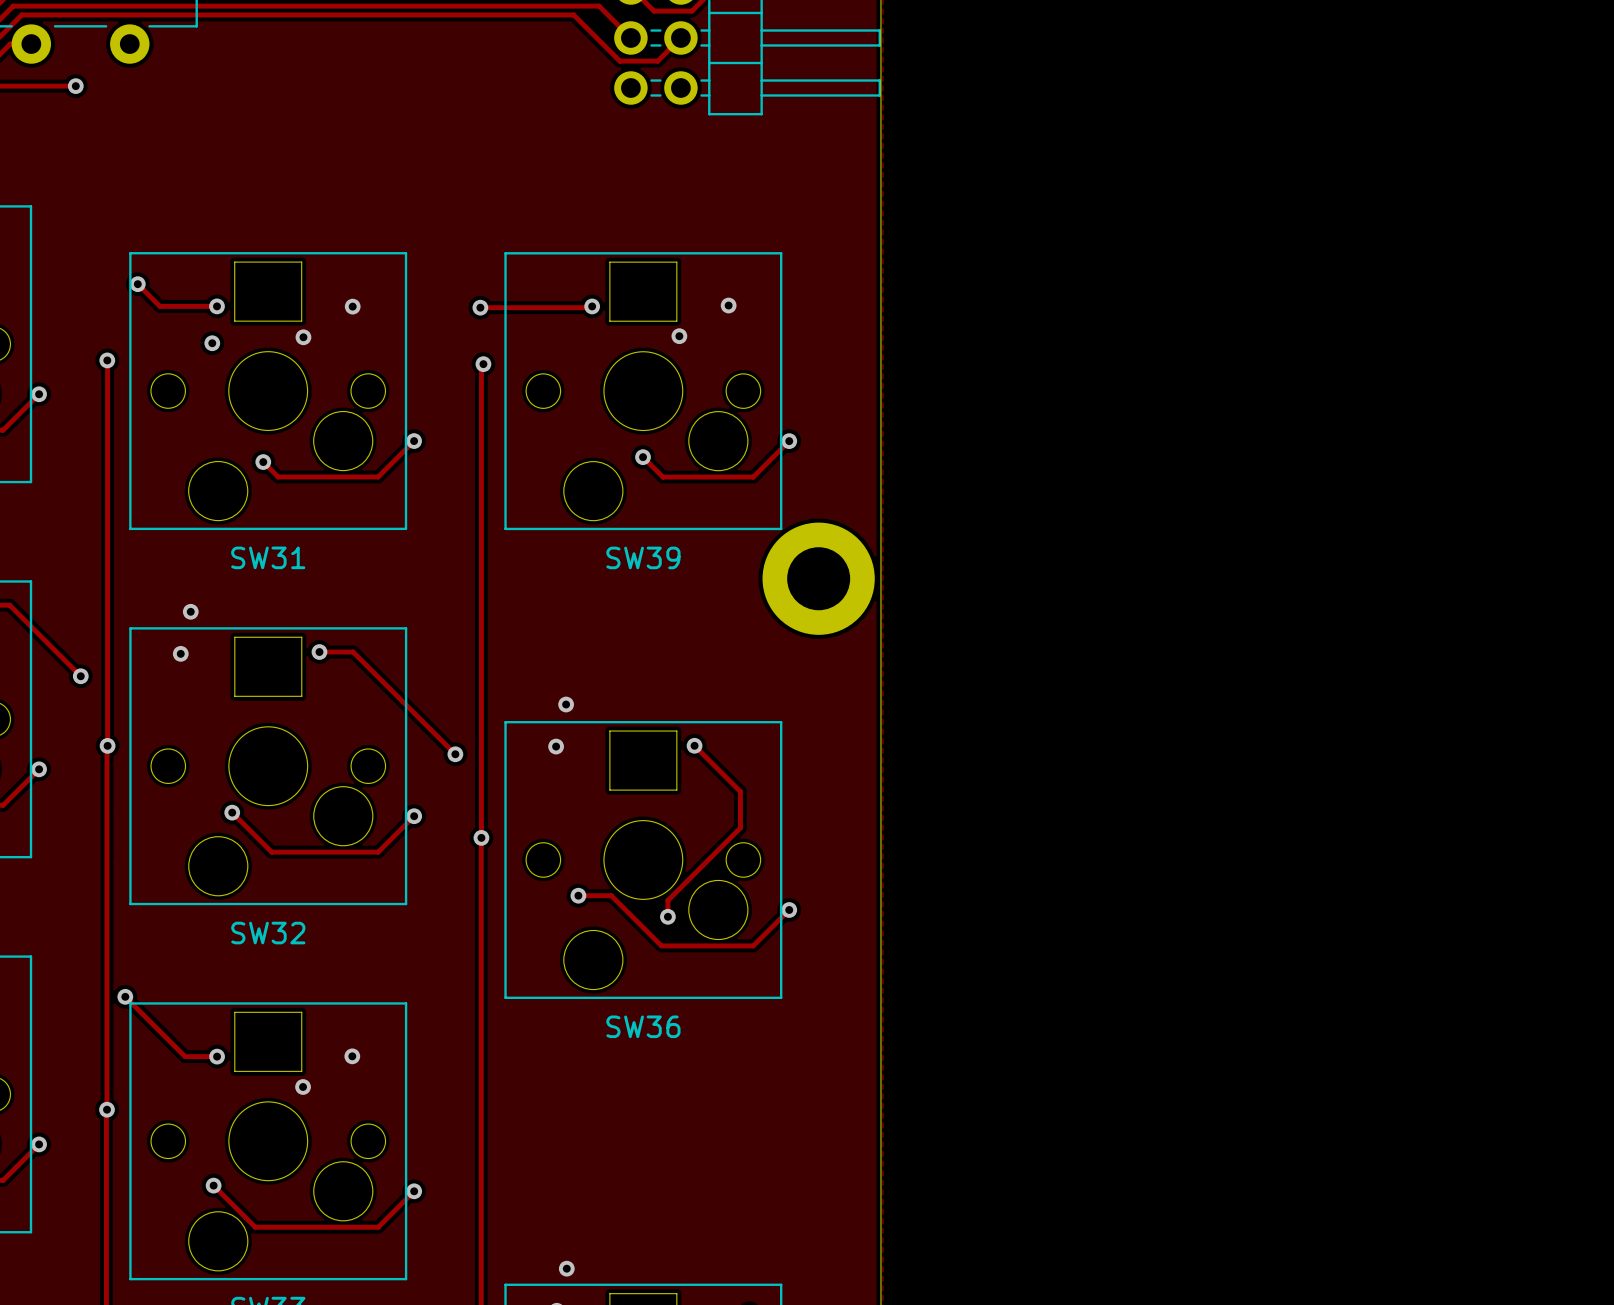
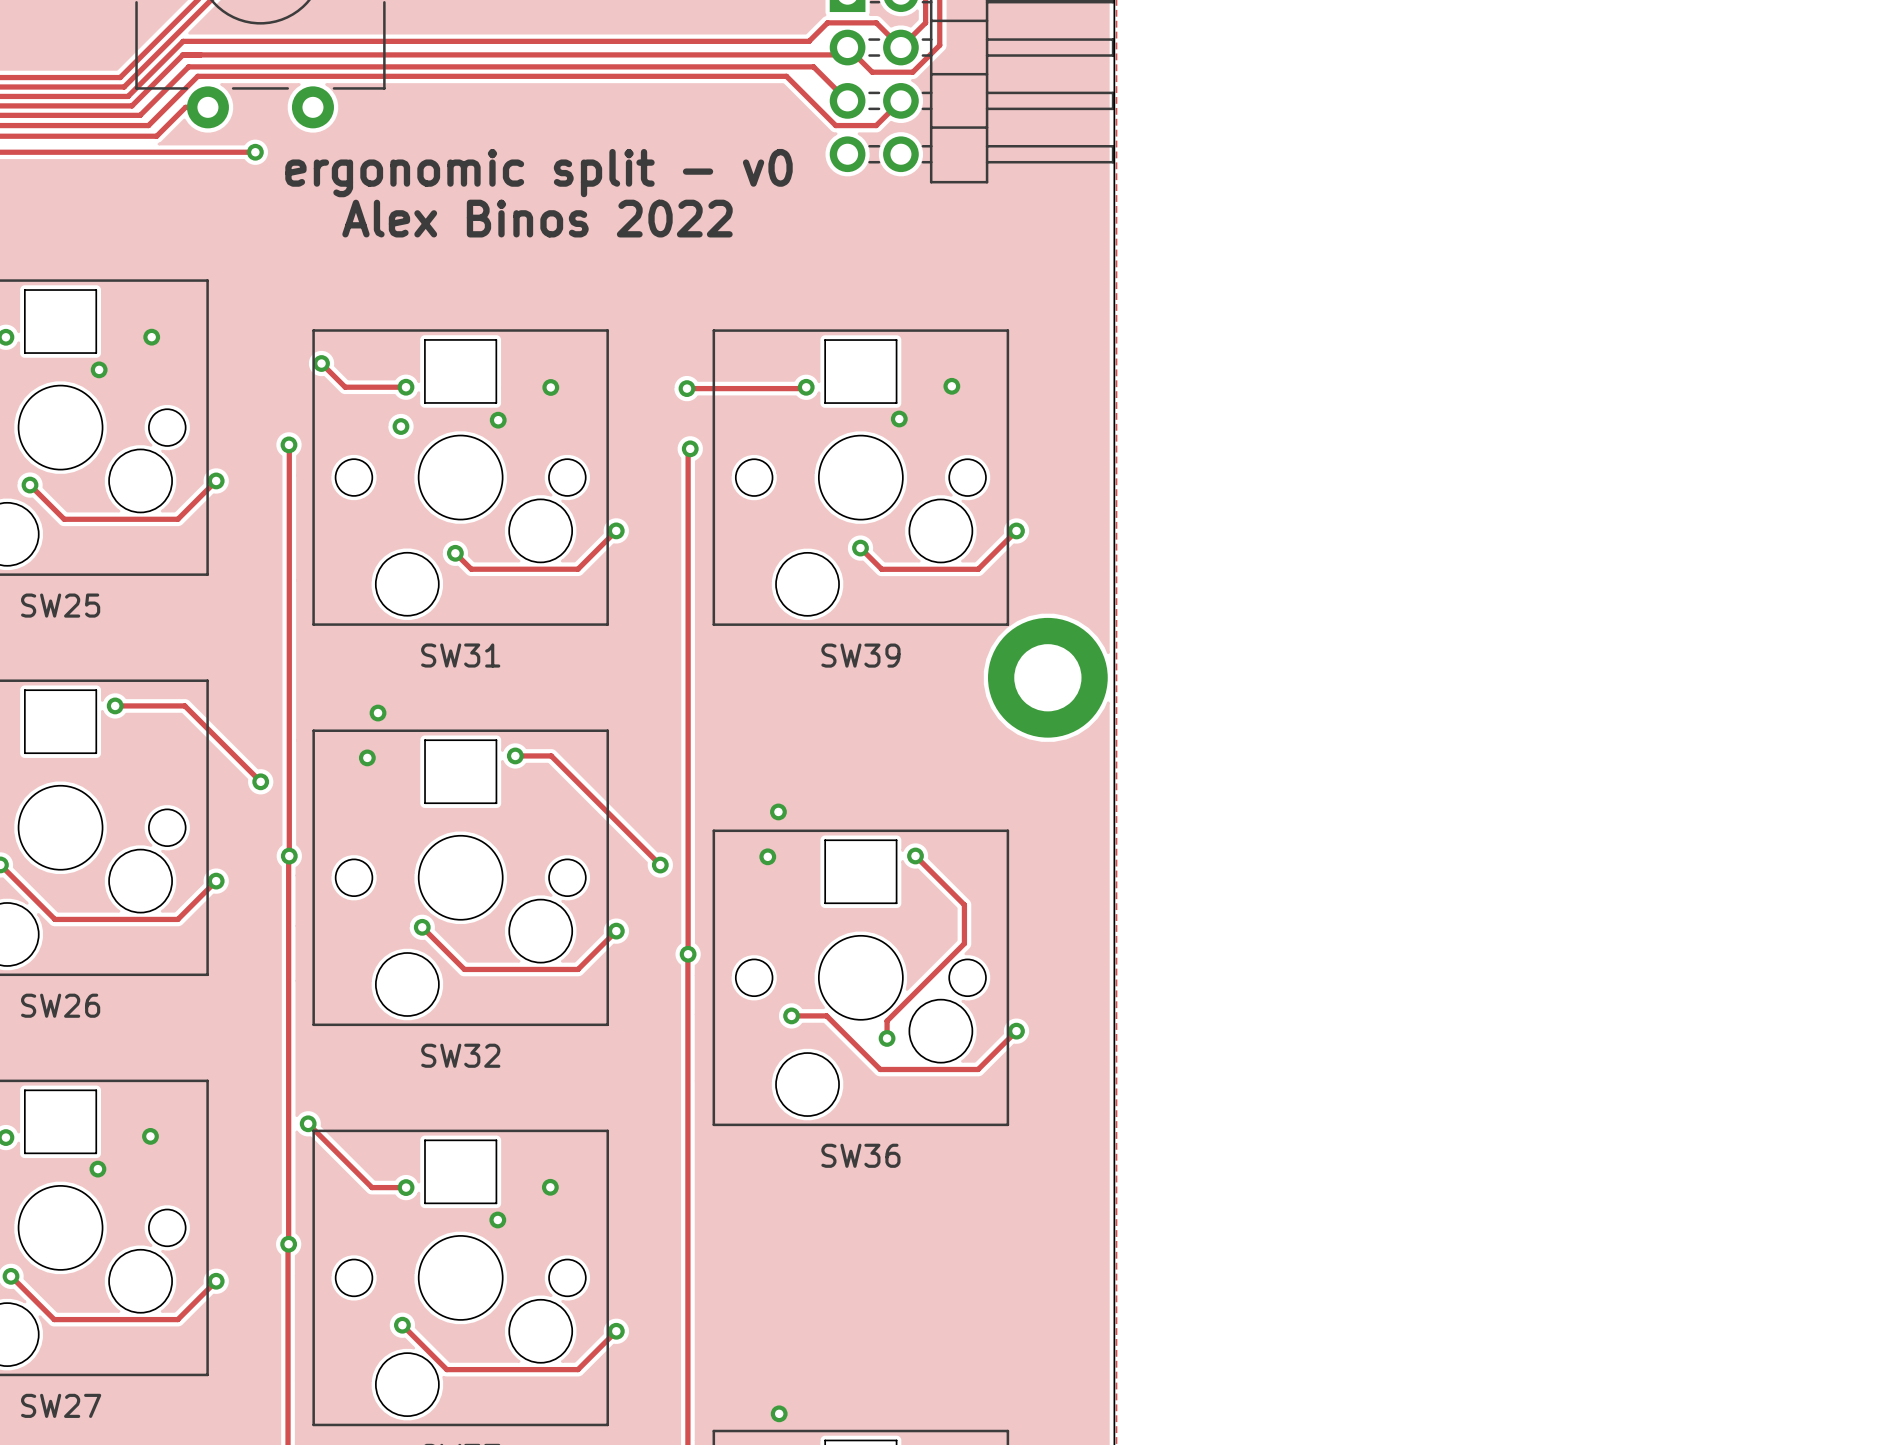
text: none -> ergonomic split - v0 (538, 173)
text: none -> Alex Binos 2022 (537, 218)

